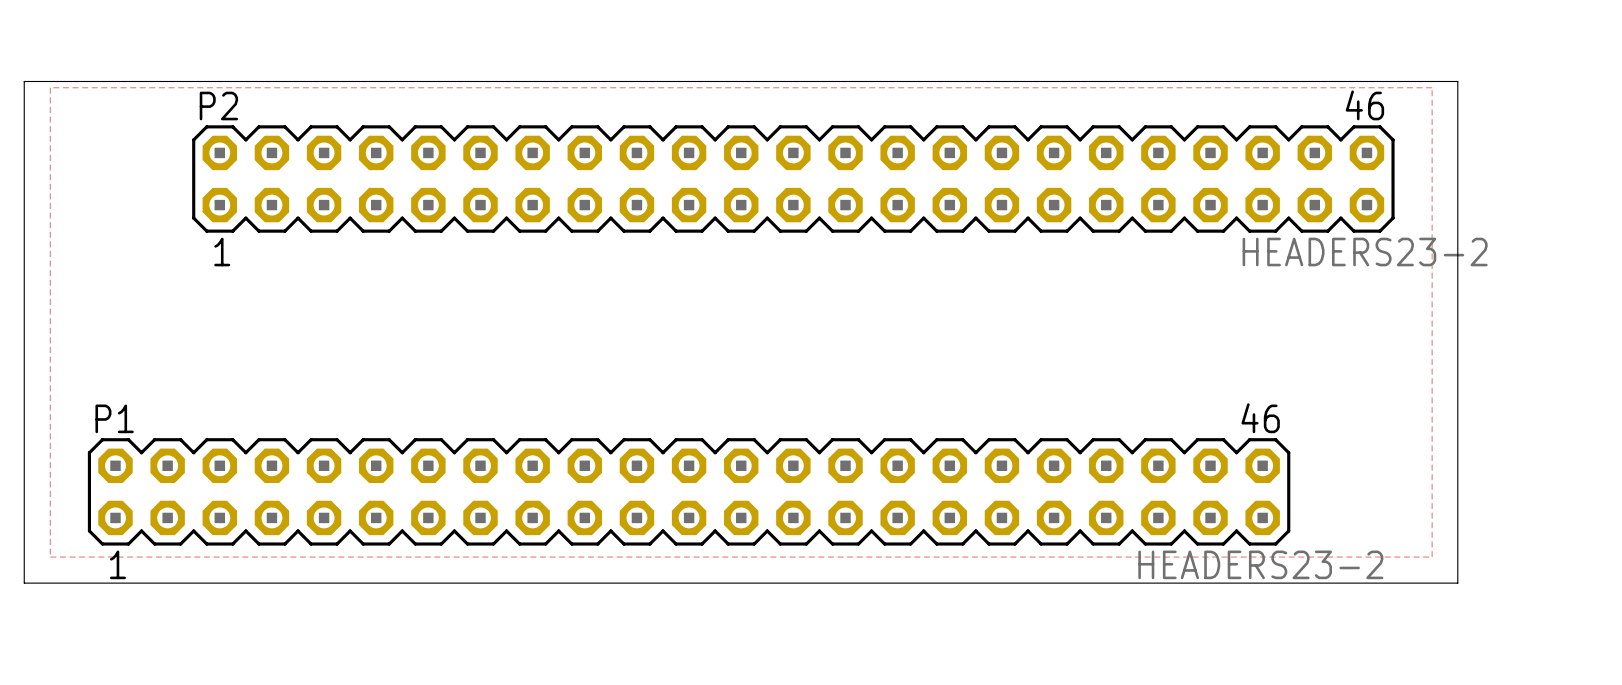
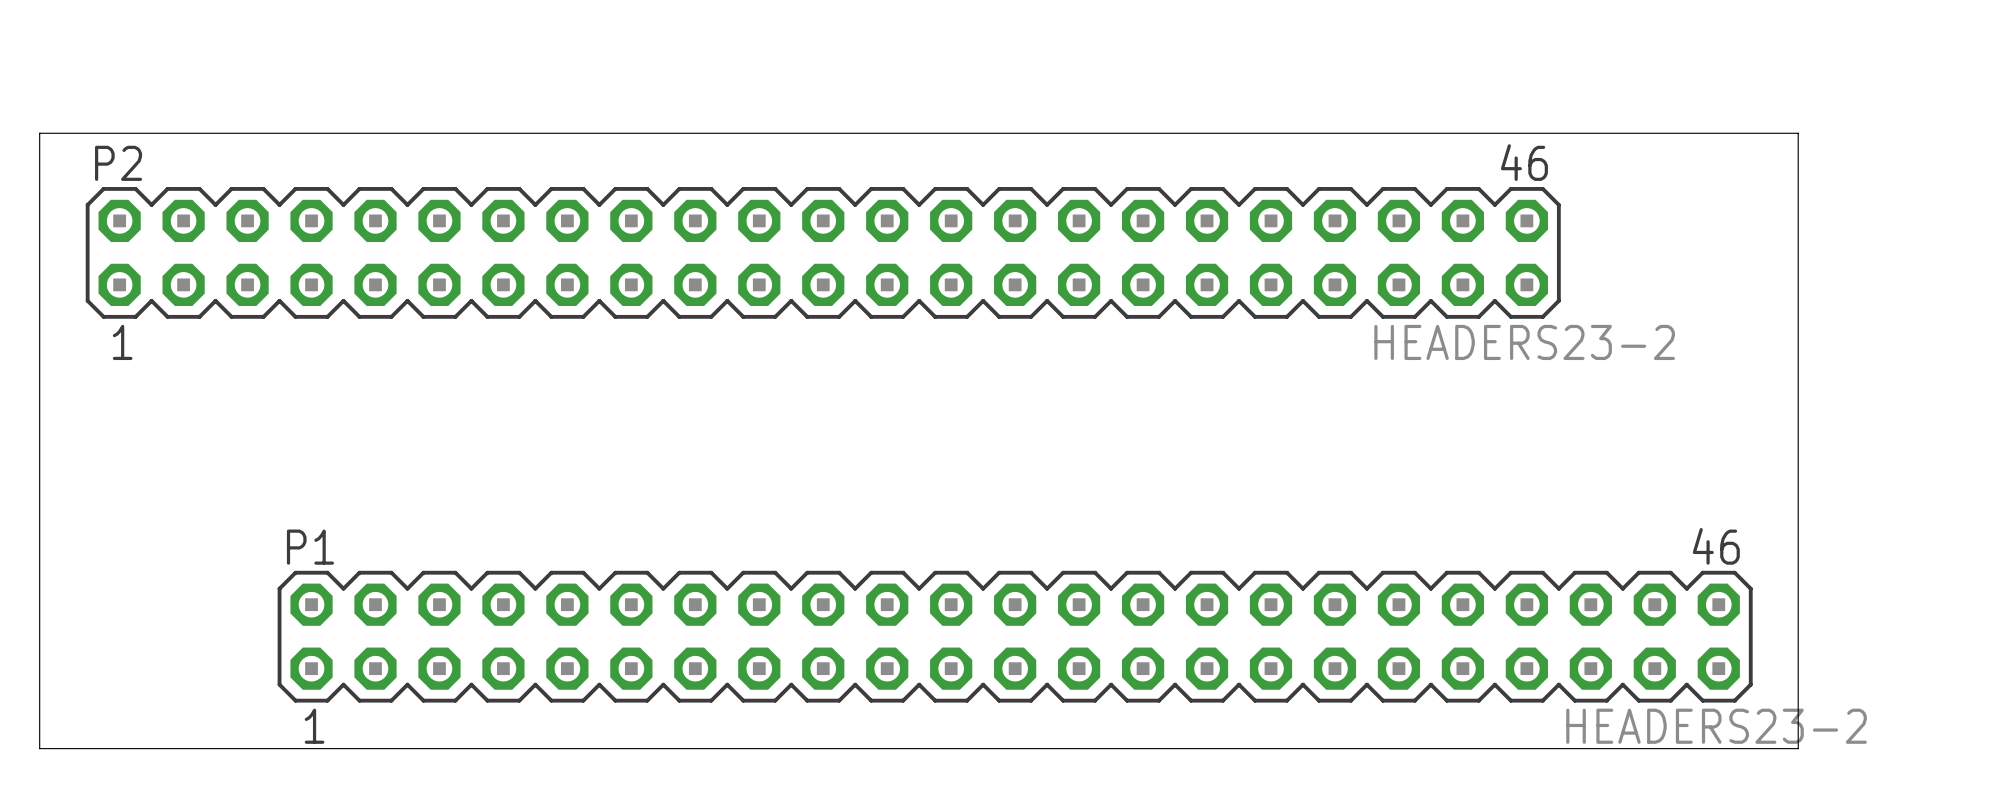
zone outline: (50, 87) (50, 557) (1432, 557) (1432, 87) (50, 87) -> none
P2 position: (793, 179) -> (823, 252)
P1 position: (689, 491) -> (1015, 636)

